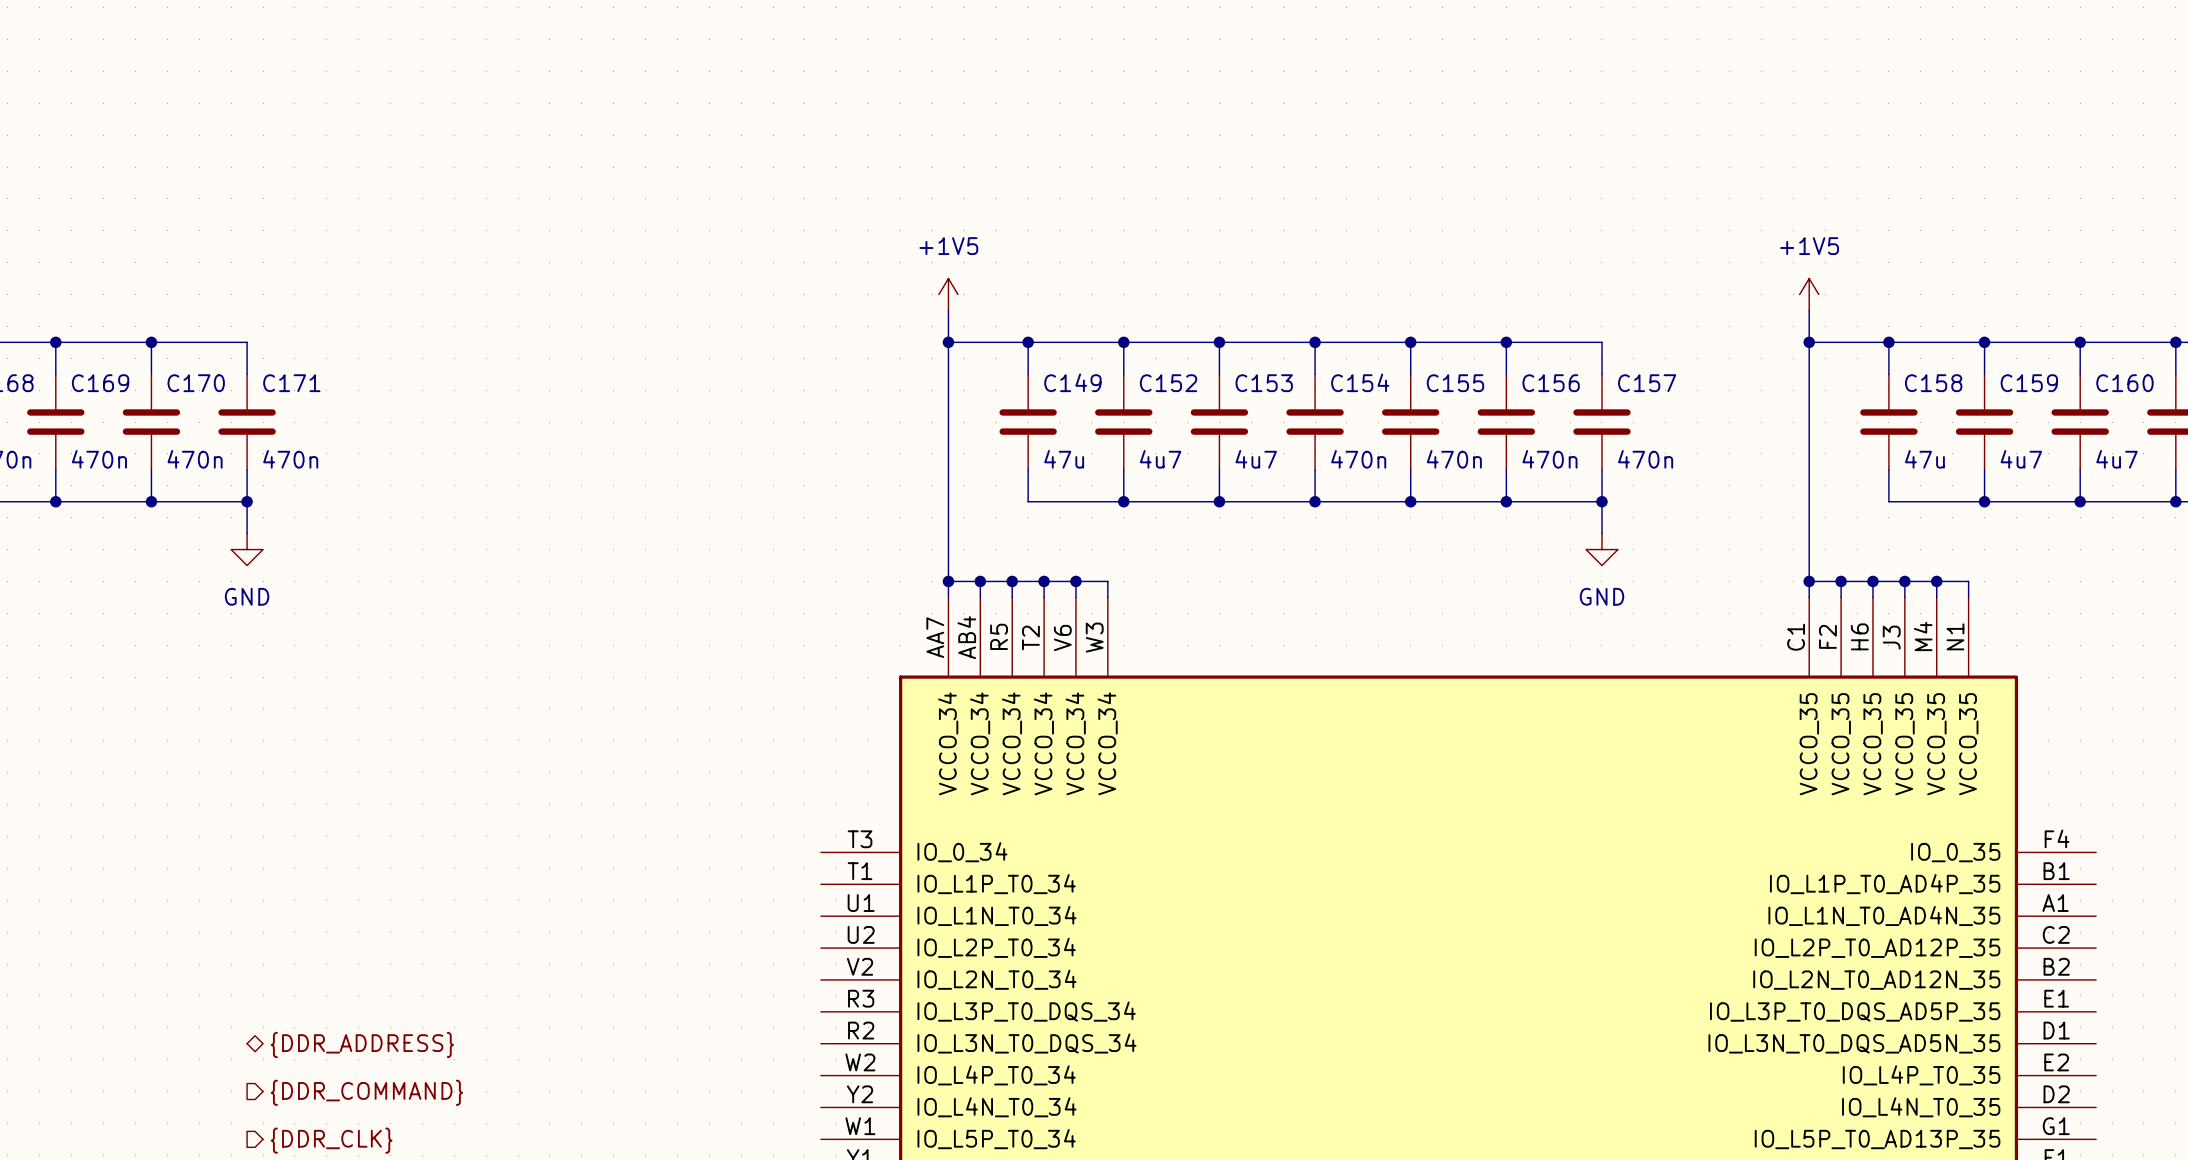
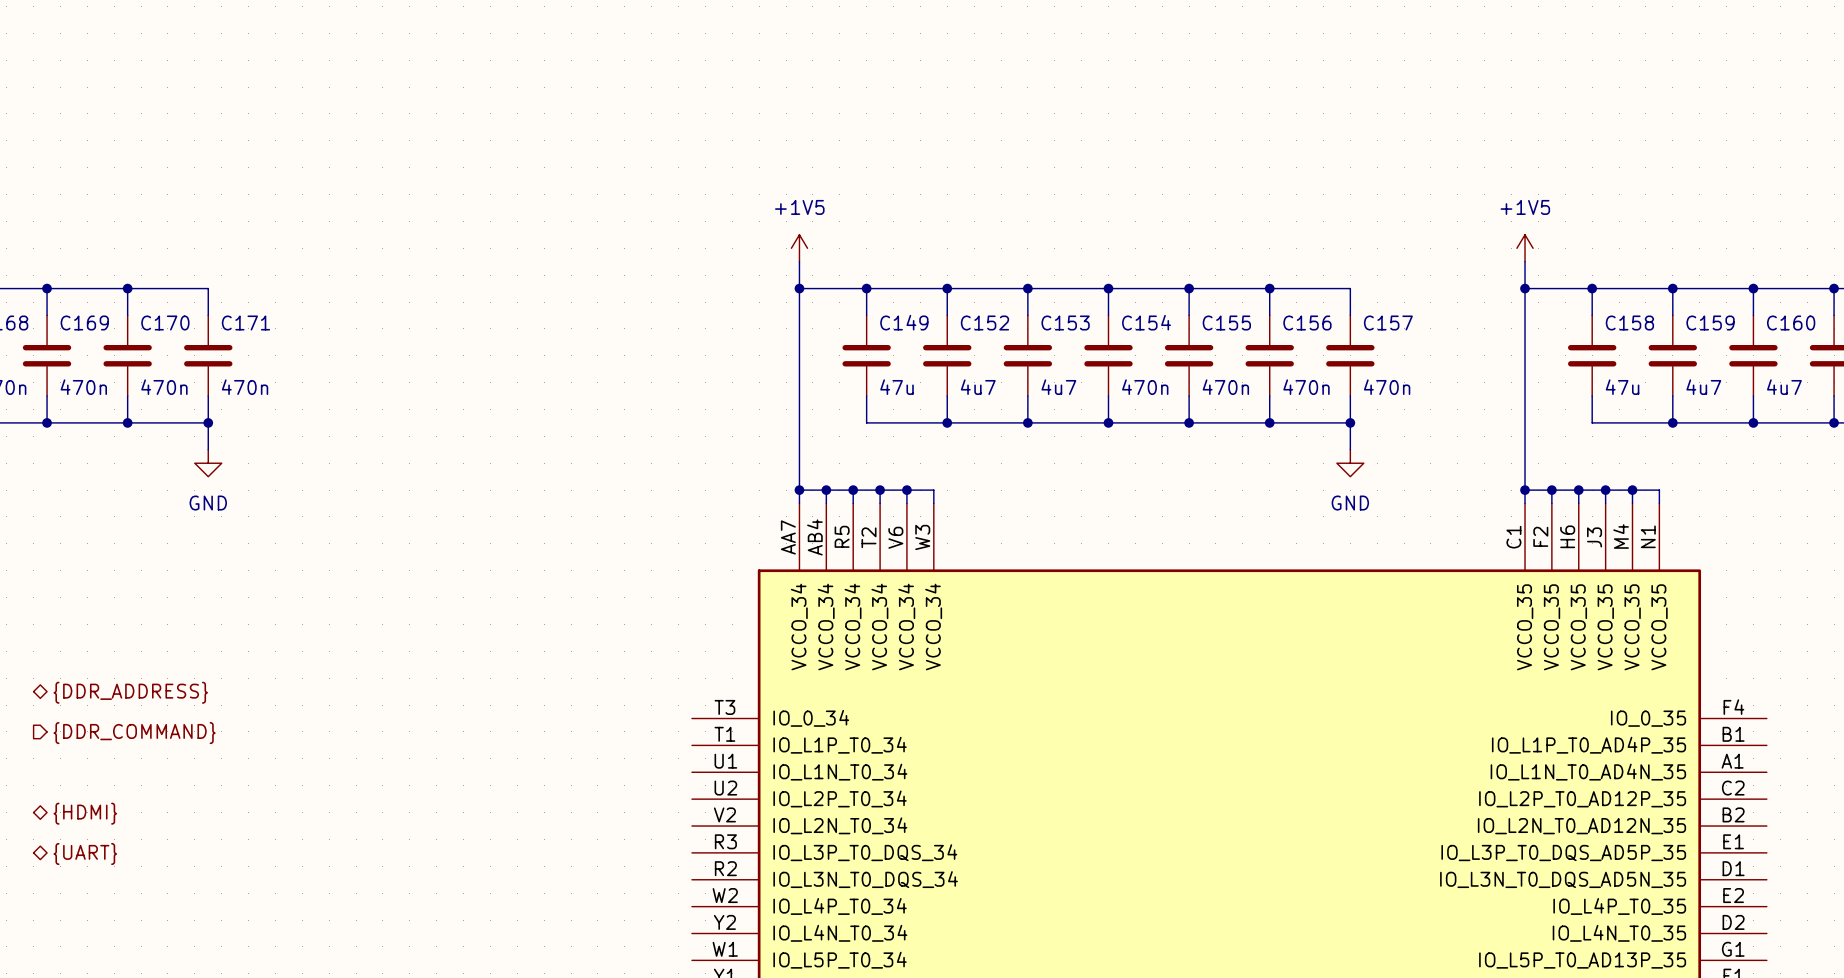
hierarchical label: none -> {HDMI} (85, 813)
hierarchical label: none -> {UART} (85, 853)
hierarchical label position: {DDR_ADDRESS} (362, 1045) -> {DDR_ADDRESS} (130, 692)
hierarchical label position: {DDR_COMMAND} (366, 1092) -> {DDR_COMMAND} (134, 733)
hierarchical label: {DDR_CLK} (331, 1140) -> none

